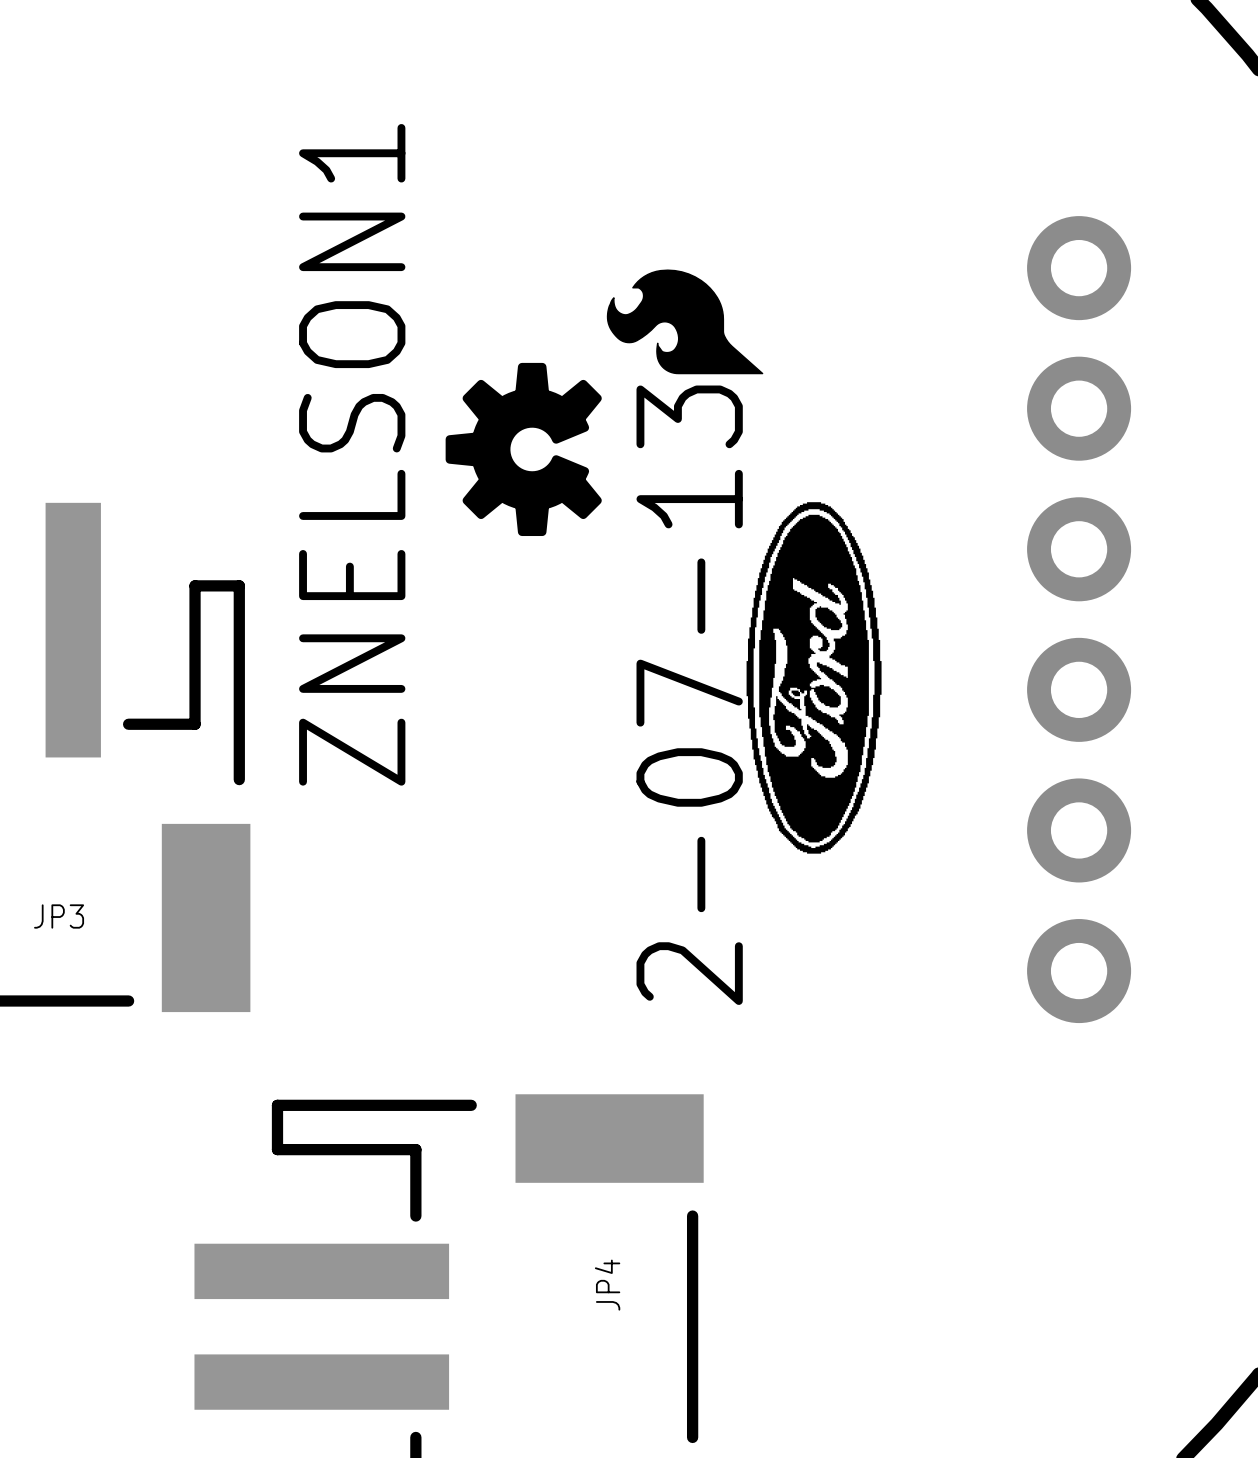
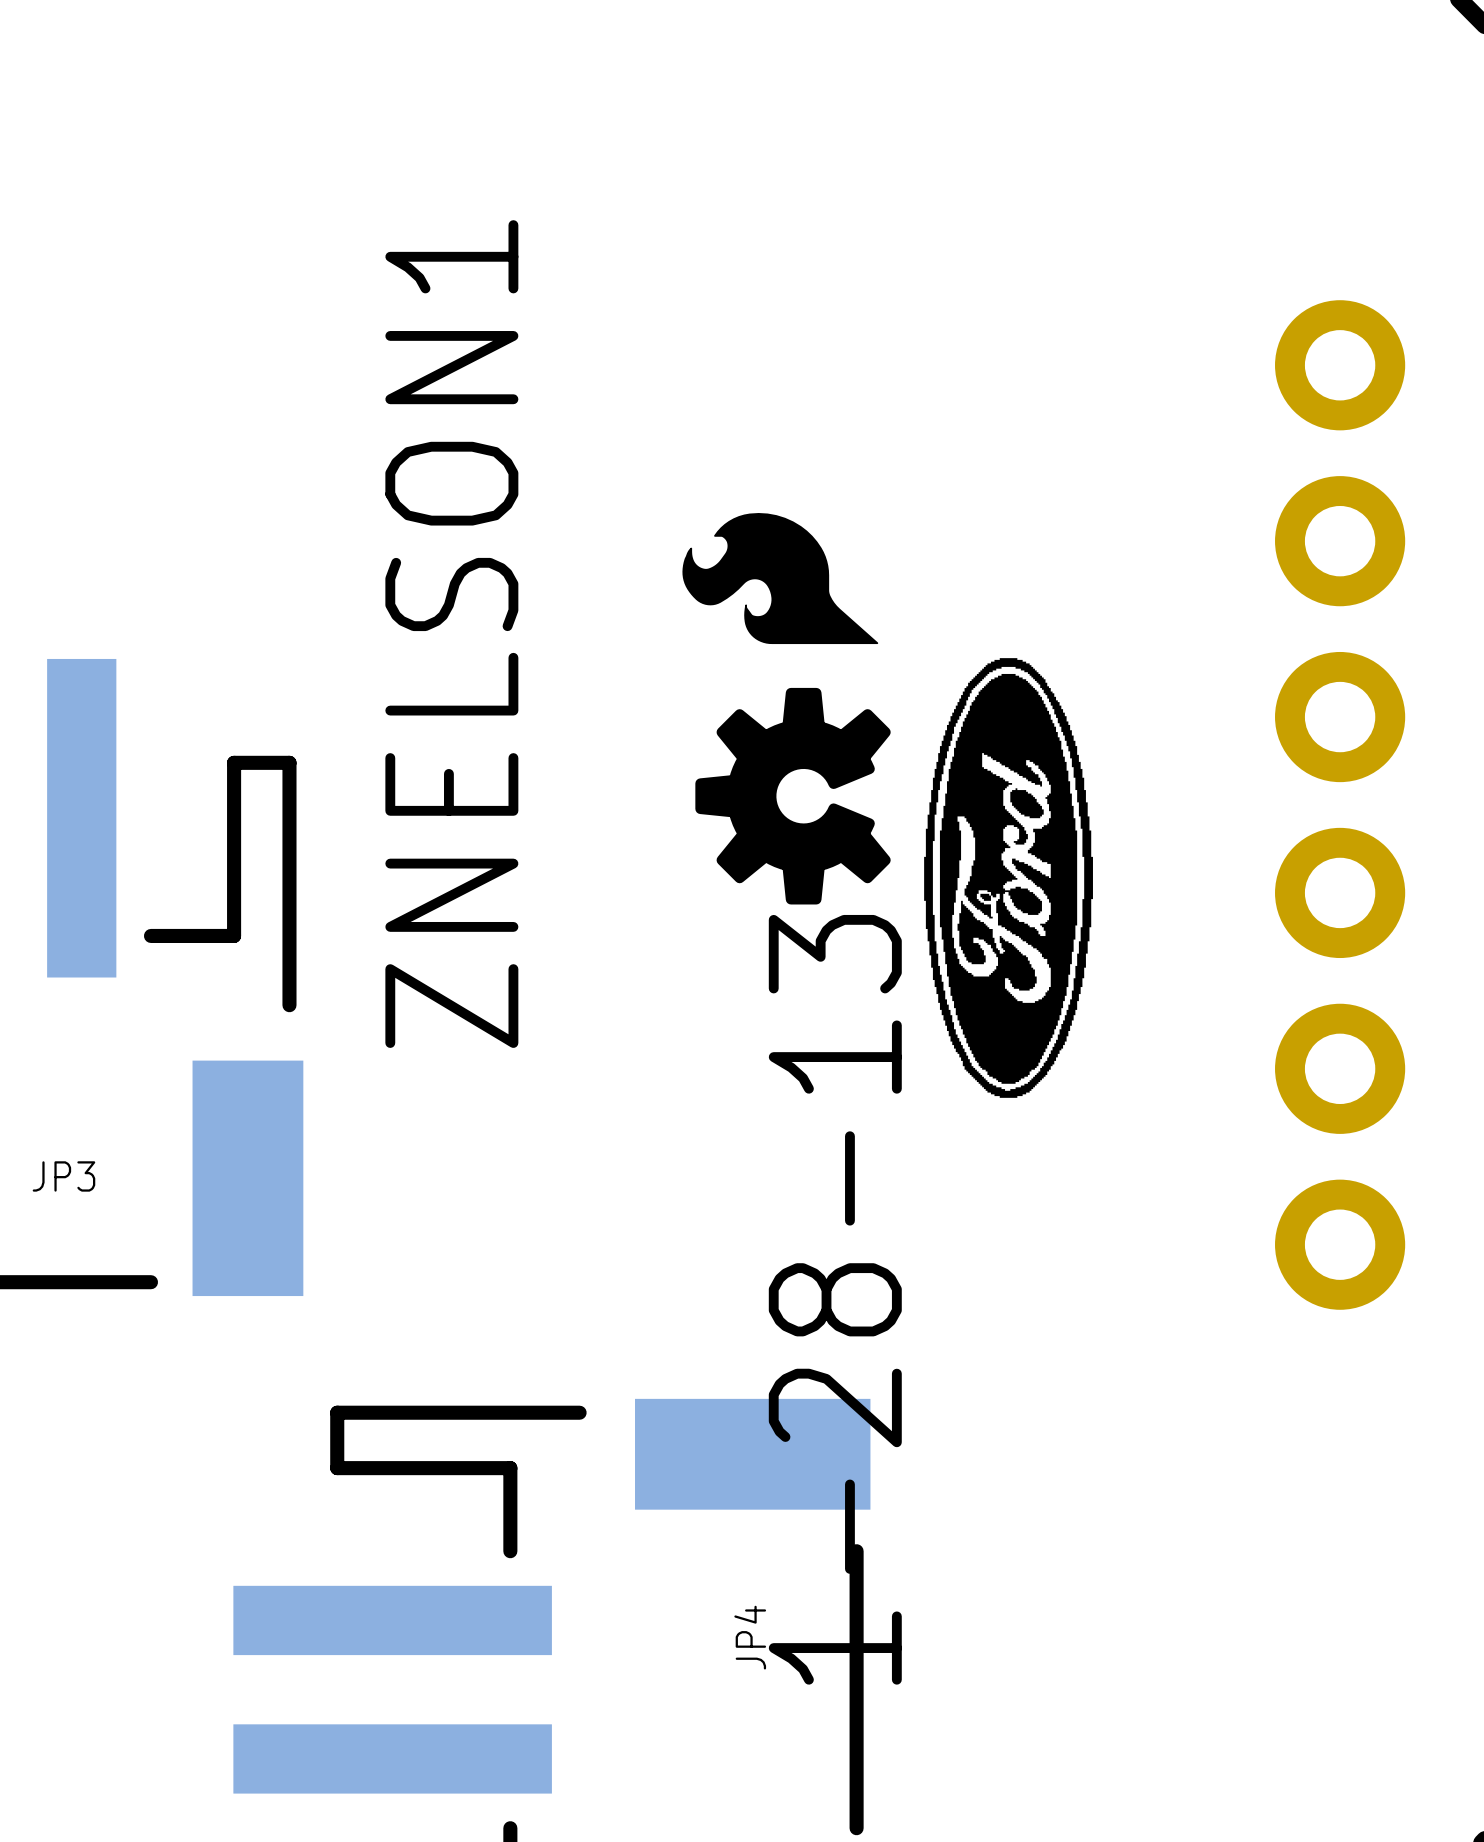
drawing position: (685, 321) -> (780, 578)
drawing position: (523, 449) -> (793, 796)
text position: ZNELSON1 (352, 454) -> ZNELSON1 (451, 634)
text: 2-07-13 (689, 695) -> none
text: none -> 1-28-13 (835, 1299)

